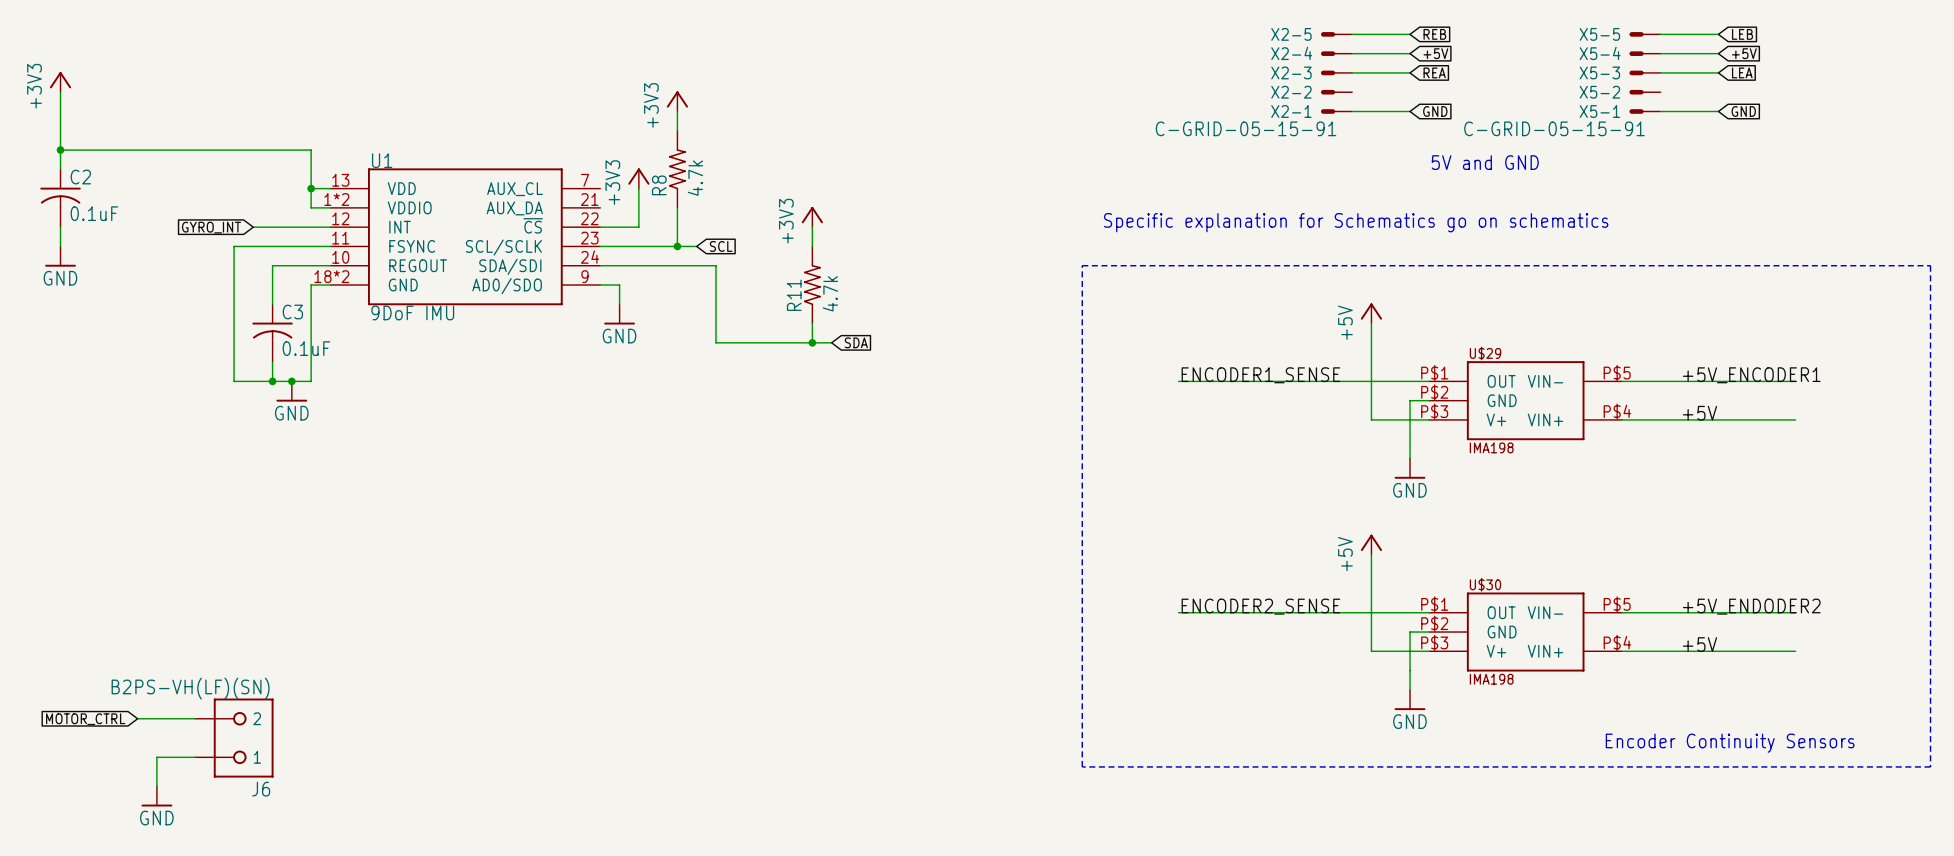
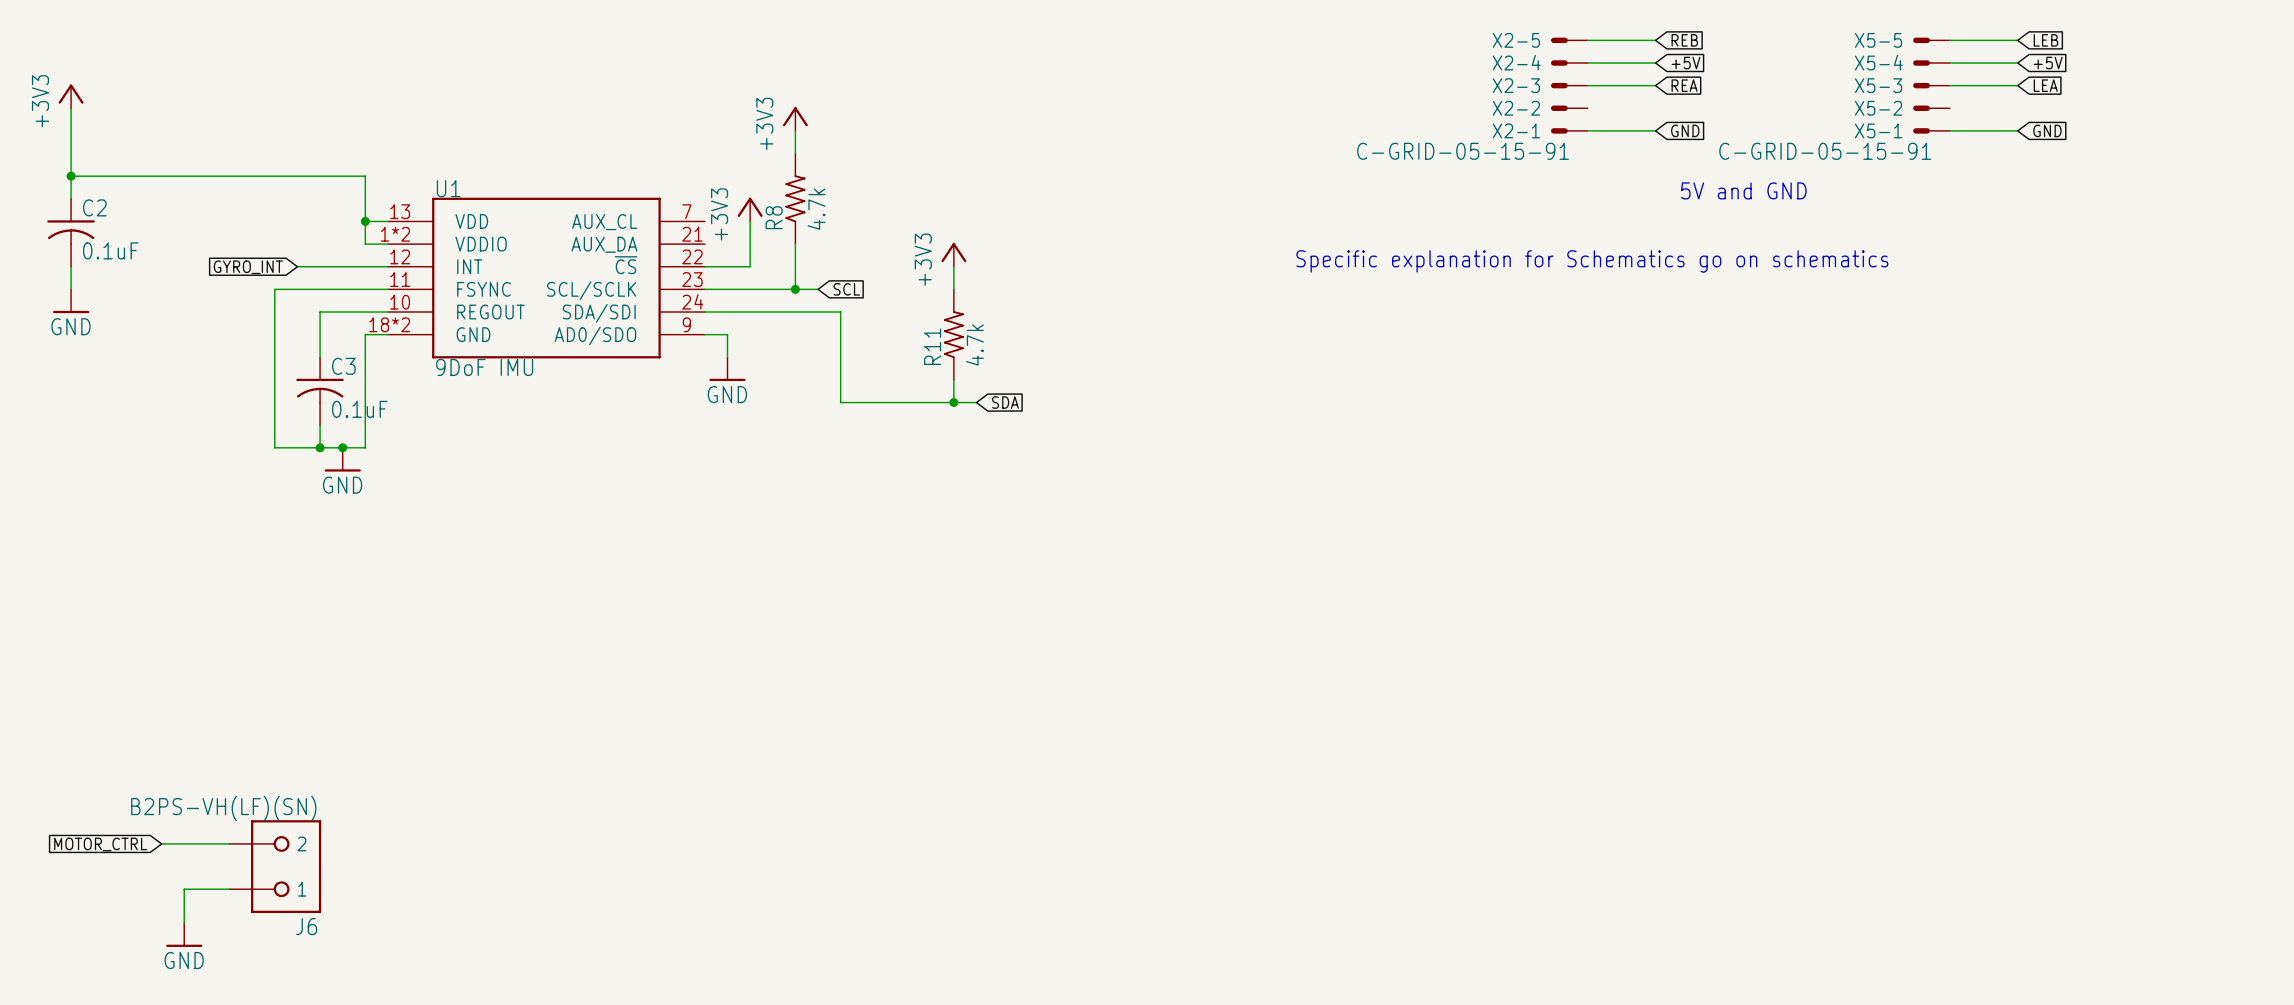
line: (1082, 265) (1930, 265) (1930, 766) (1082, 766) (1082, 265) -> none
power symbol: +5V (1371, 313) -> none
wire: (1371, 323) (1371, 419) (1429, 419) -> none
label: ENCODER1_SENSE (1260, 375) -> none
label: +5V_ENCODER1 (1751, 375) -> none
wire: (1178, 381) (1429, 381) -> none
wire: (1622, 381) (1795, 381) -> none
wire: (1429, 400) (1410, 400) (1410, 458) -> none
U$29: IMA198 (1525, 400) -> none
label: +5V (1699, 413) -> none
wire: (1622, 419) (1795, 419) -> none
power symbol: GND (1410, 468) -> none
power symbol: +5V (1371, 544) -> none
wire: (1371, 554) (1371, 651) (1429, 651) -> none
label: ENCODER2_SENSE (1260, 606) -> none
label: +5V_ENDODER2 (1751, 606) -> none
wire: (1178, 612) (1429, 612) -> none
wire: (1622, 612) (1795, 612) -> none
wire: (1429, 632) (1410, 632) (1410, 689) -> none
U$30: IMA198 (1525, 632) -> none
label: +5V (1699, 644) -> none
wire: (1622, 651) (1795, 651) -> none
power symbol: GND (1410, 699) -> none
text: Encoder Continuity Sensors (1730, 743) -> none

